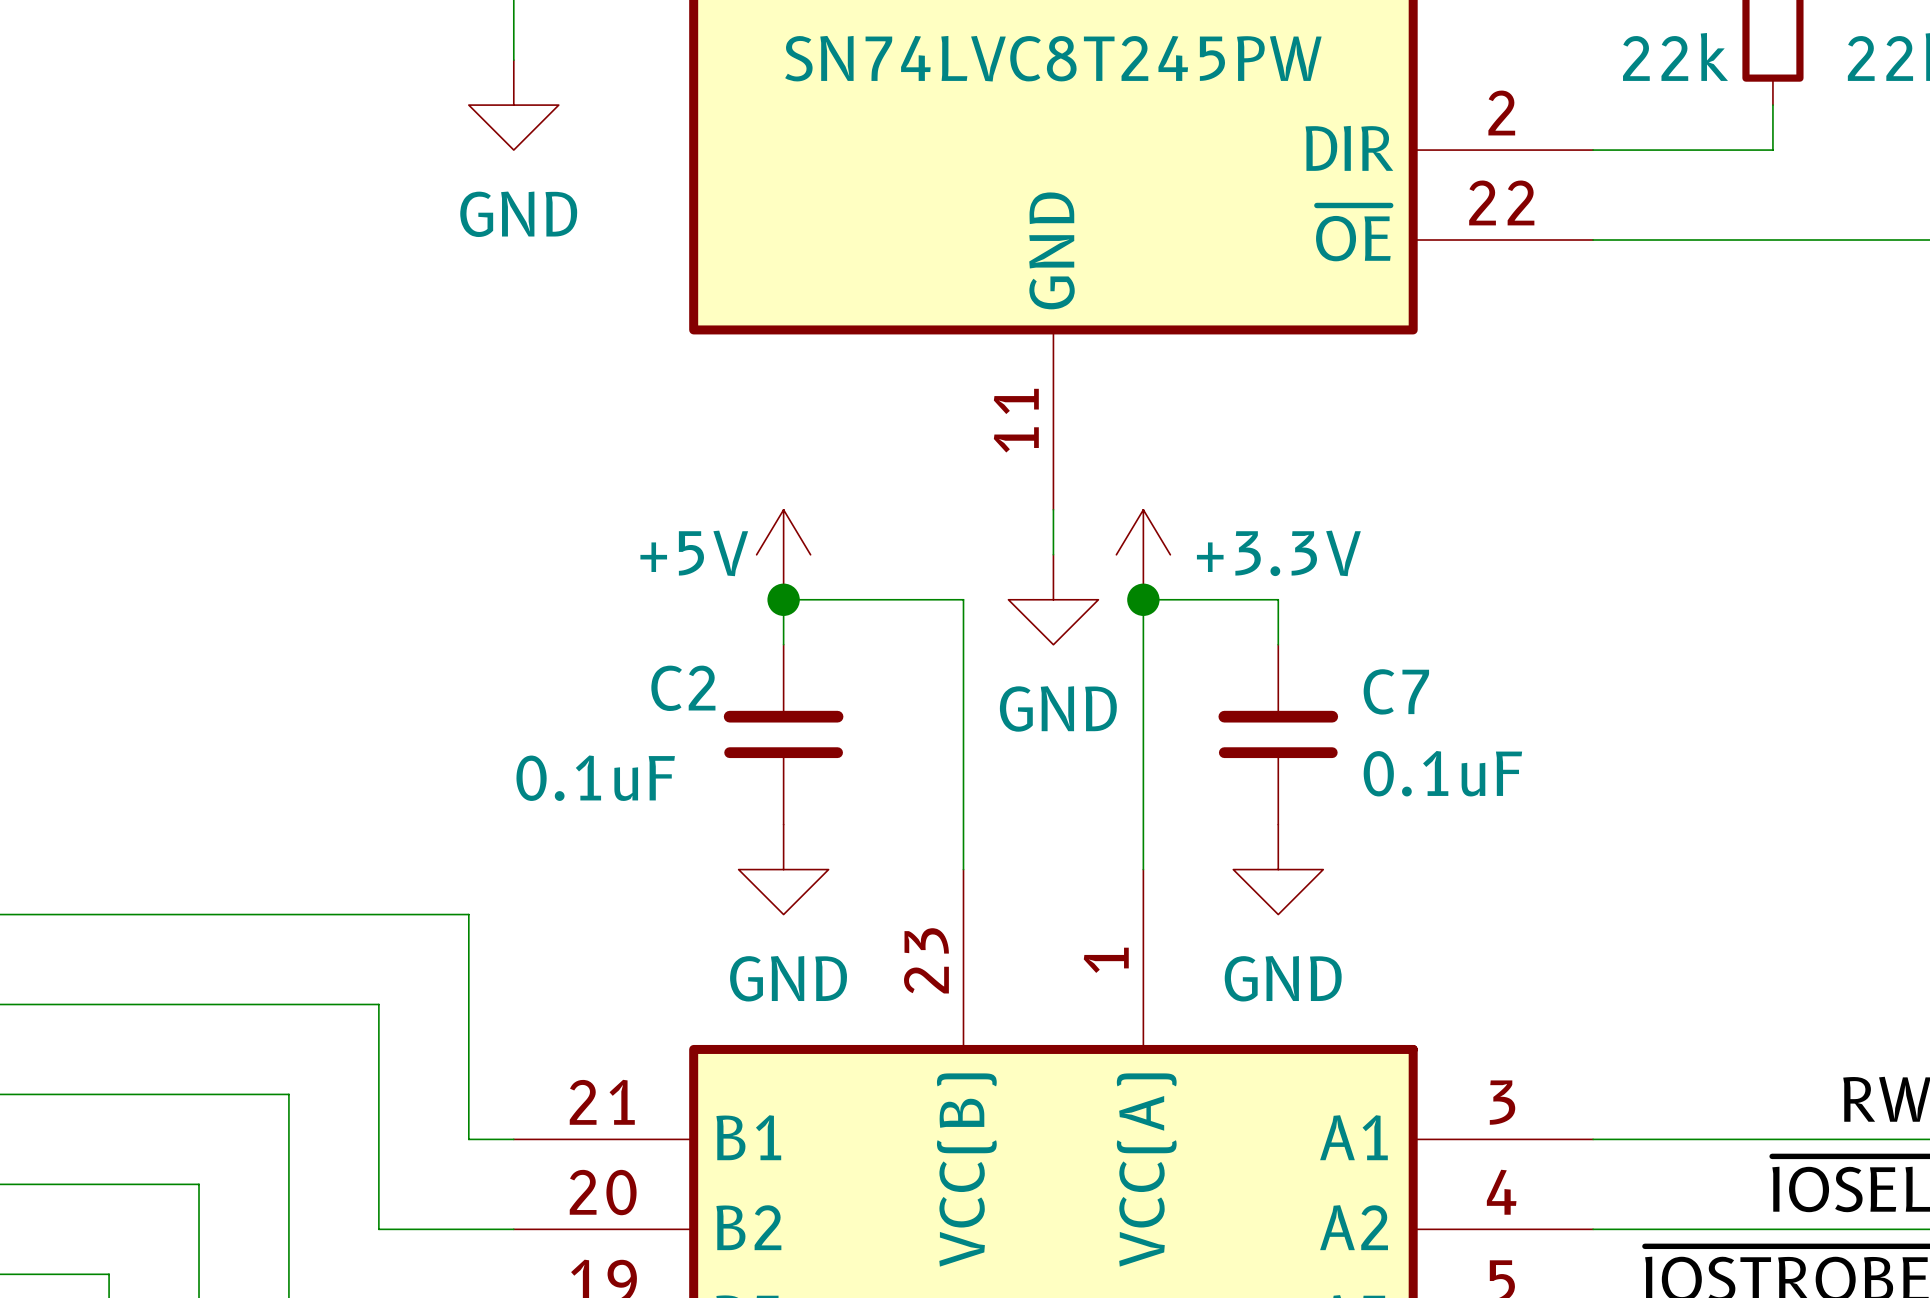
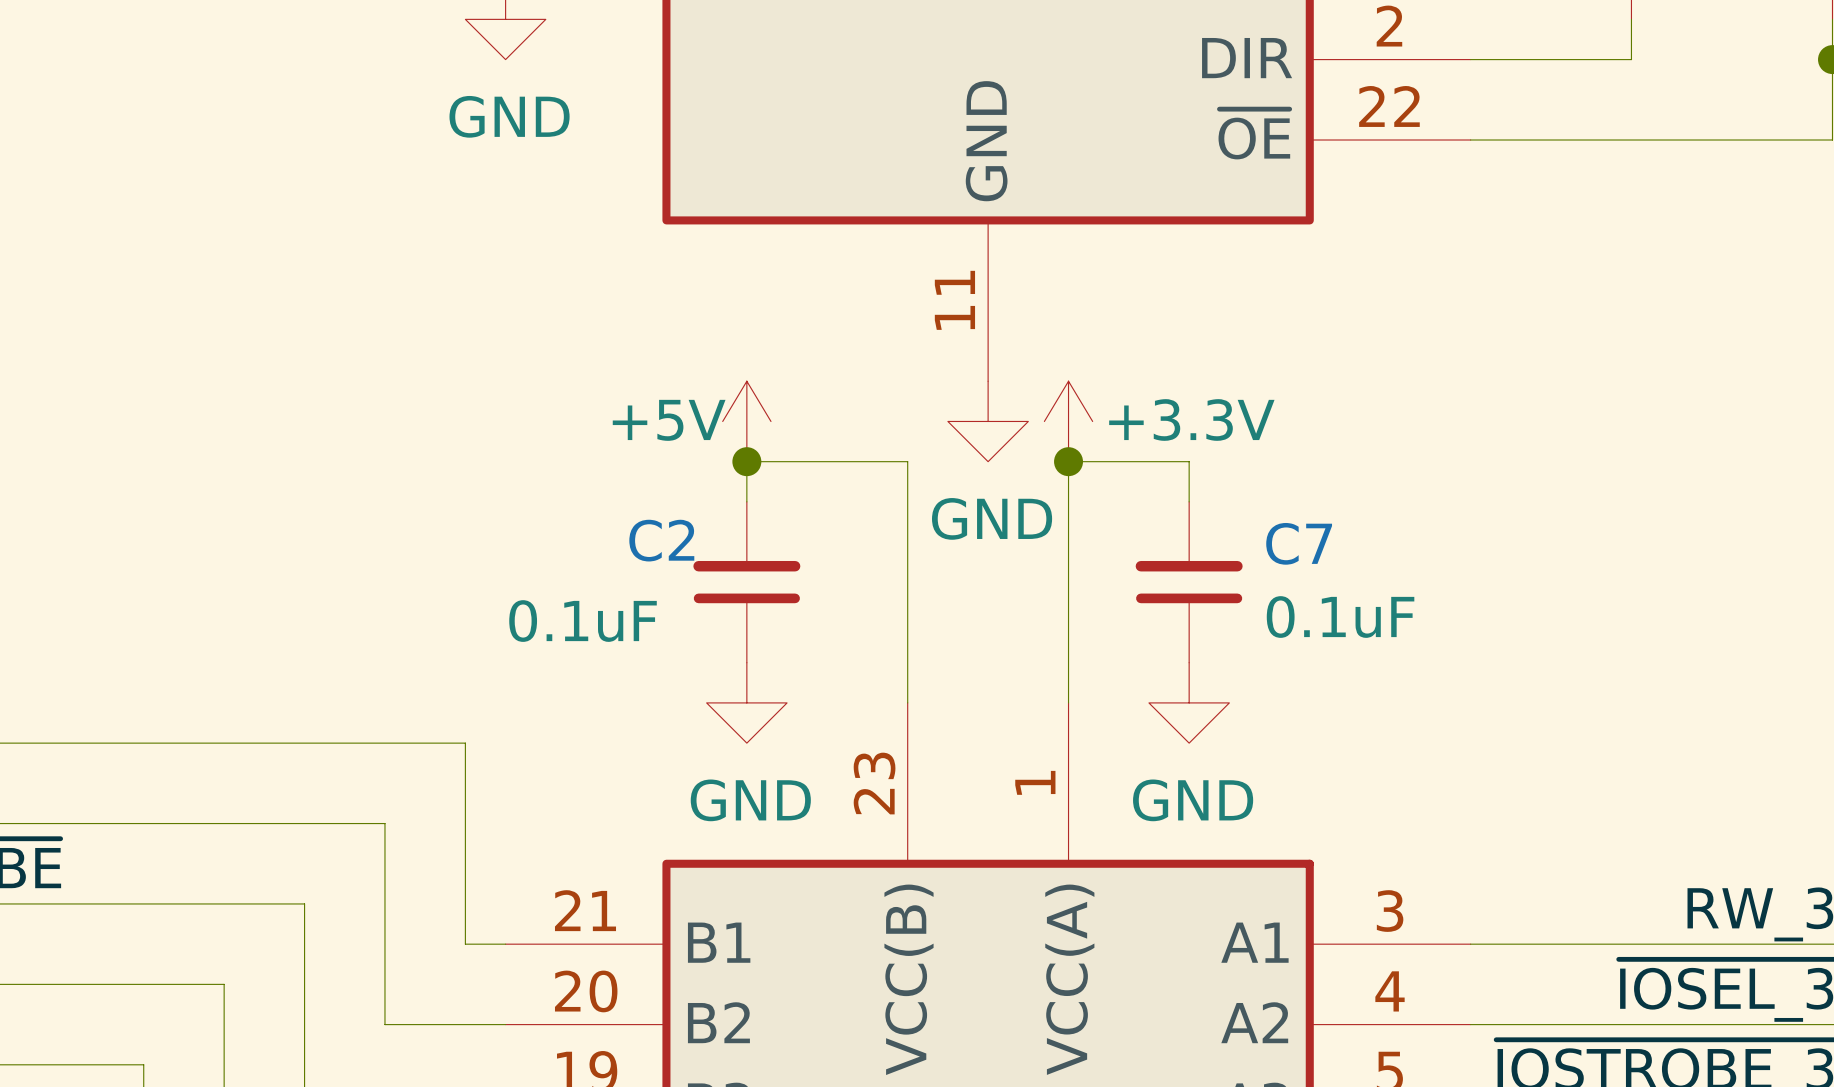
power symbol position: GND (1053, 599) -> GND (988, 421)

